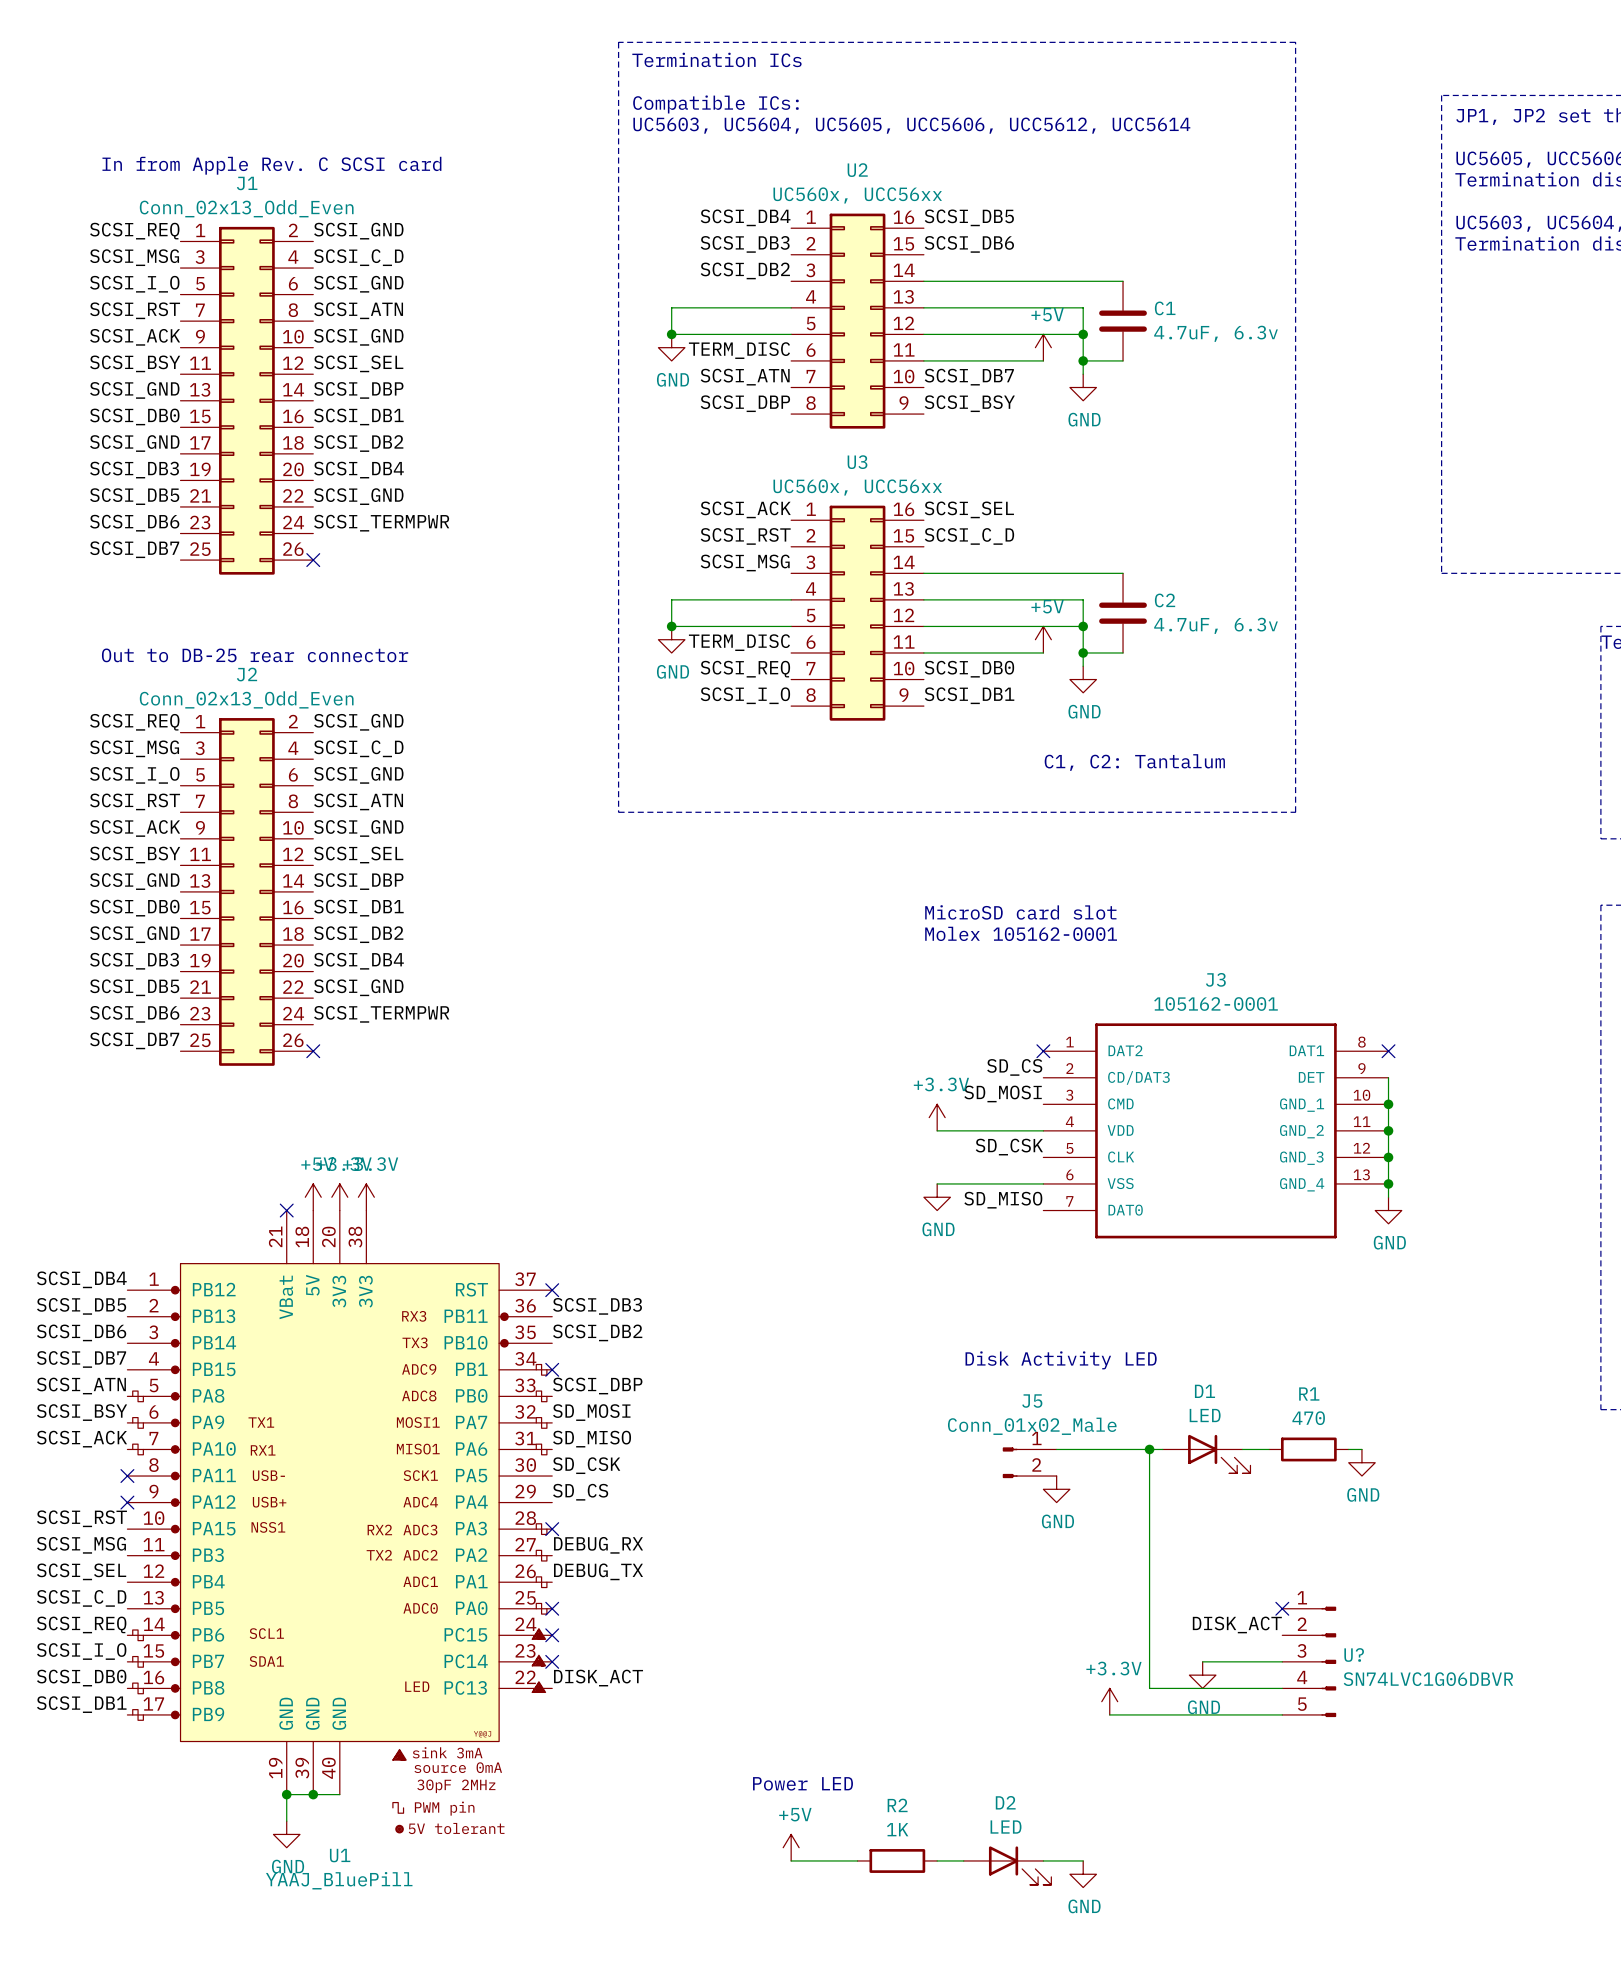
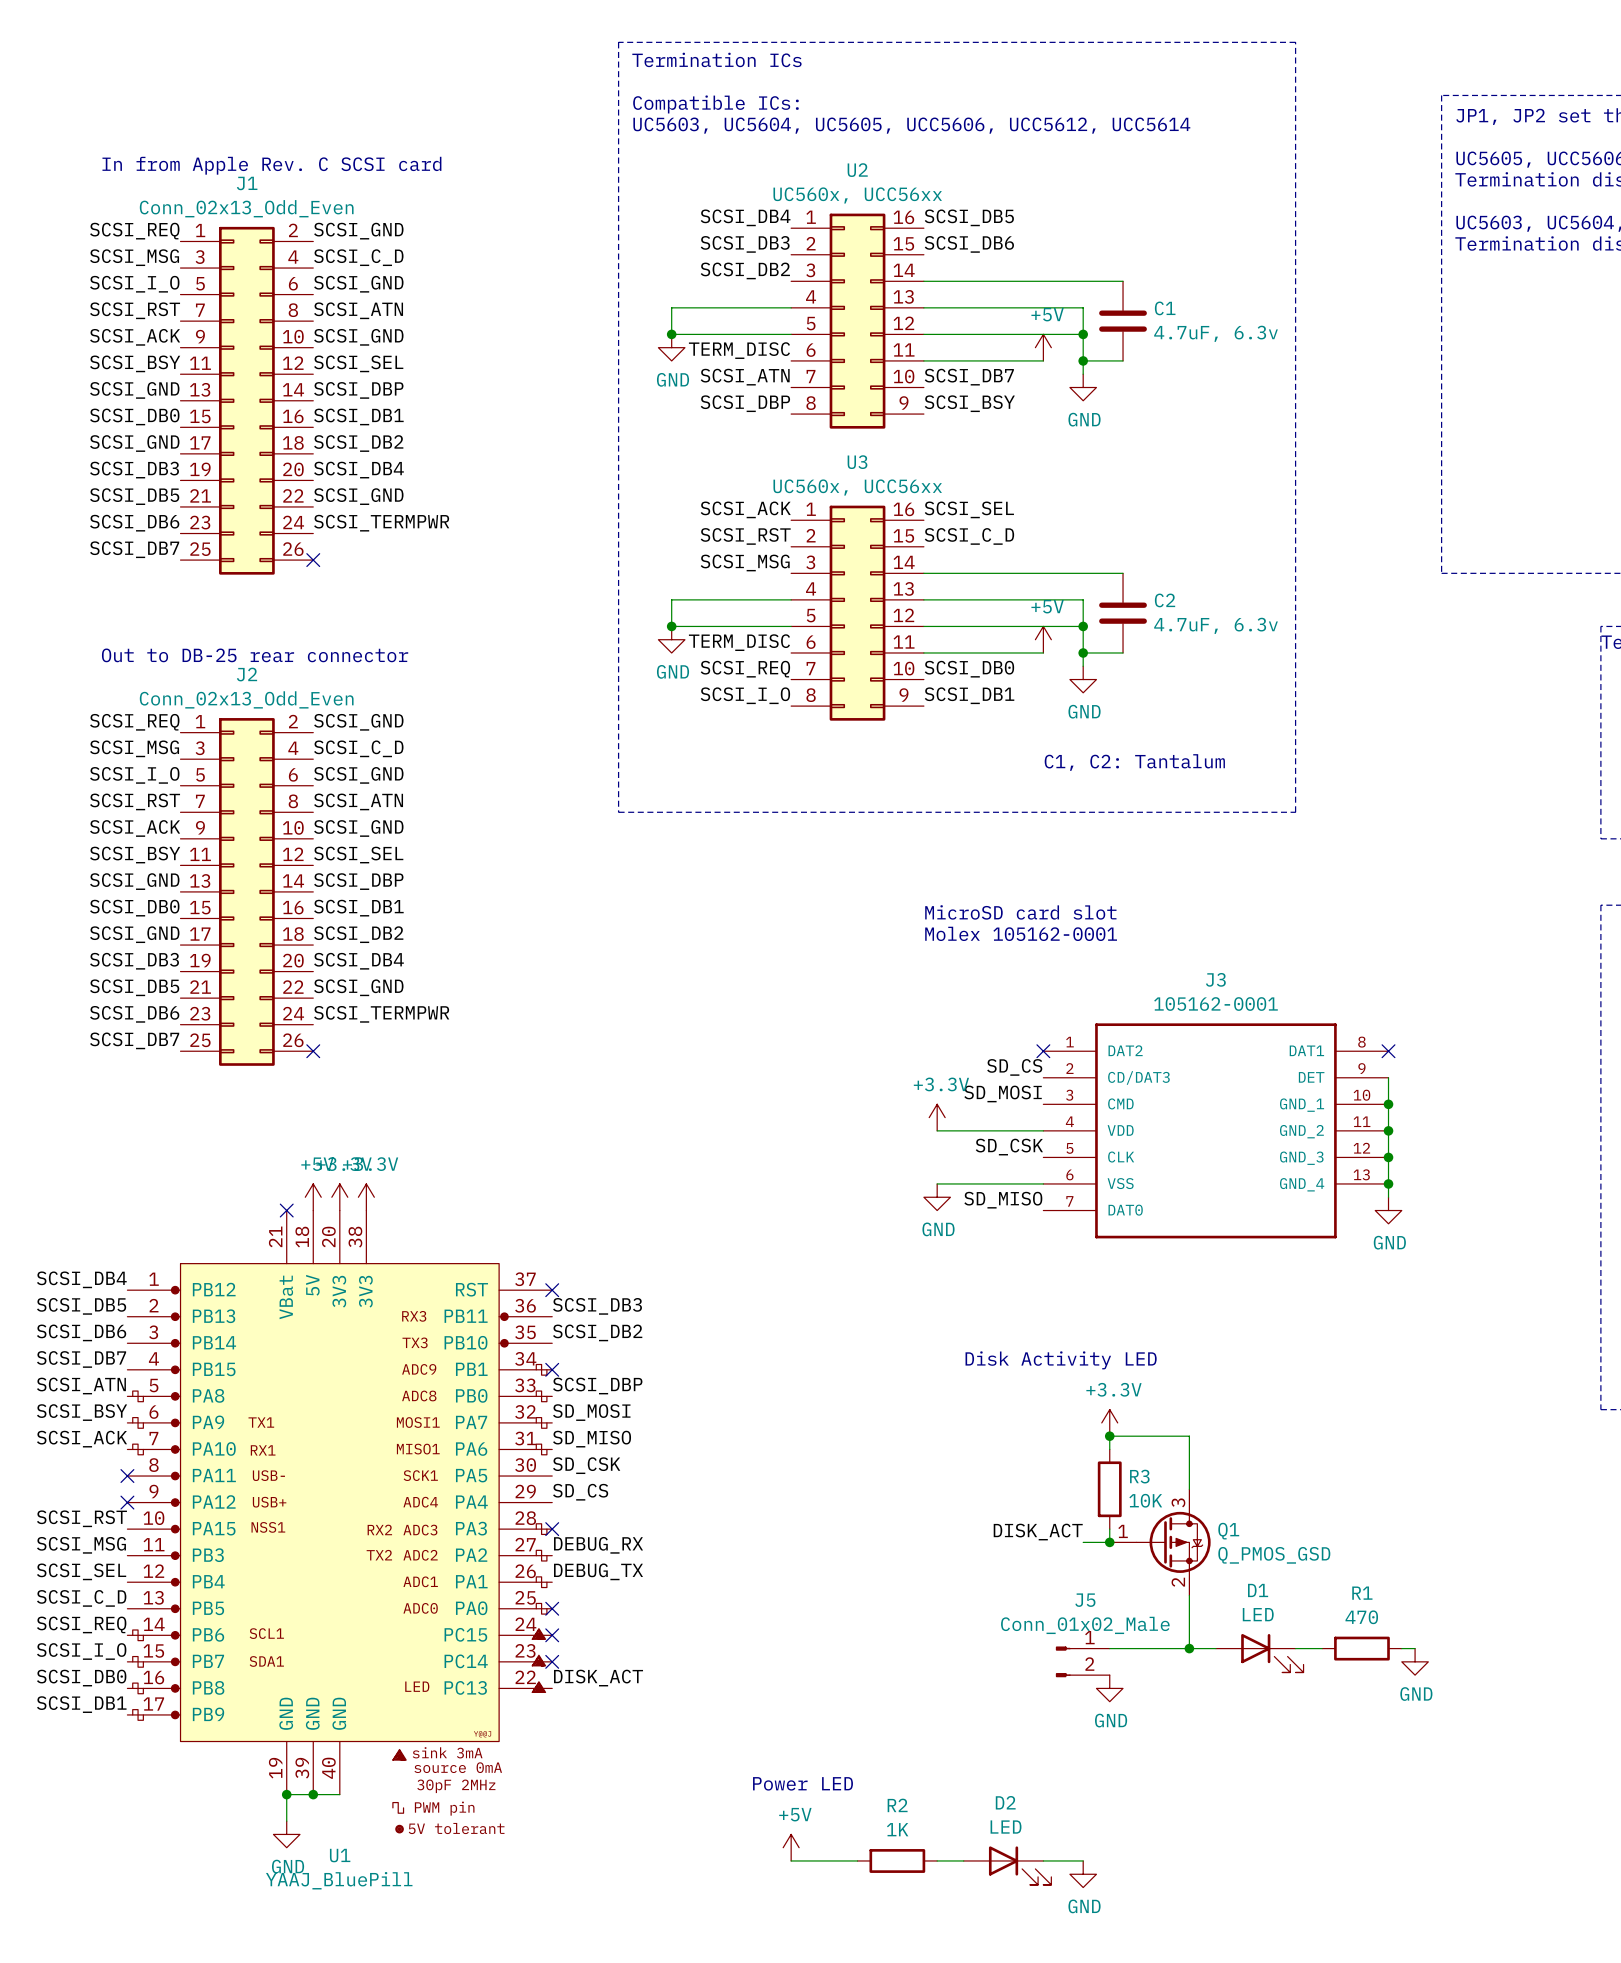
power symbol: none -> +3.3V (1109, 1422)
wire: (1056, 1449) (1162, 1449) -> (1109, 1648) (1215, 1648)
wire: none -> (1109, 1449) (1109, 1436) (1189, 1436) (1189, 1489)
wire: (1149, 1449) (1149, 1688) (1282, 1688) -> none
junction position: (1149, 1449) -> (1109, 1436)
wire: (1242, 1449) (1269, 1449) -> (1295, 1648) (1322, 1648)
R1 position: (1308, 1449) -> (1361, 1648)
wire: (1348, 1449) (1361, 1449) -> (1401, 1648) (1415, 1648)
D1 position: (1206, 1454) -> (1259, 1653)
J5 position: (1029, 1462) -> (1082, 1661)
power symbol: GND (1361, 1462) -> none
power symbol: GND (1056, 1489) -> none
R3: none -> 10K (1109, 1489)
wire: none -> (1109, 1529) (1109, 1542) (1083, 1542)
junction: none -> (1109, 1542)
Q1: none -> Q_PMOS_GSD (1160, 1542)
wire: none -> (1189, 1595) (1189, 1648)
no-connect mark: (1282, 1608) -> none
label position: DISK_ACT (1237, 1624) -> DISK_ACT (1038, 1532)
junction: none -> (1189, 1648)
wire: (1202, 1661) (1282, 1661) -> none
U?: SN74LVC1G06DBVR (1309, 1661) -> none
power symbol: none -> GND (1415, 1661)
power symbol position: GND (1202, 1675) -> GND (1109, 1688)
power symbol: +3.3V (1109, 1701) -> none
wire: (1109, 1714) (1282, 1714) -> none

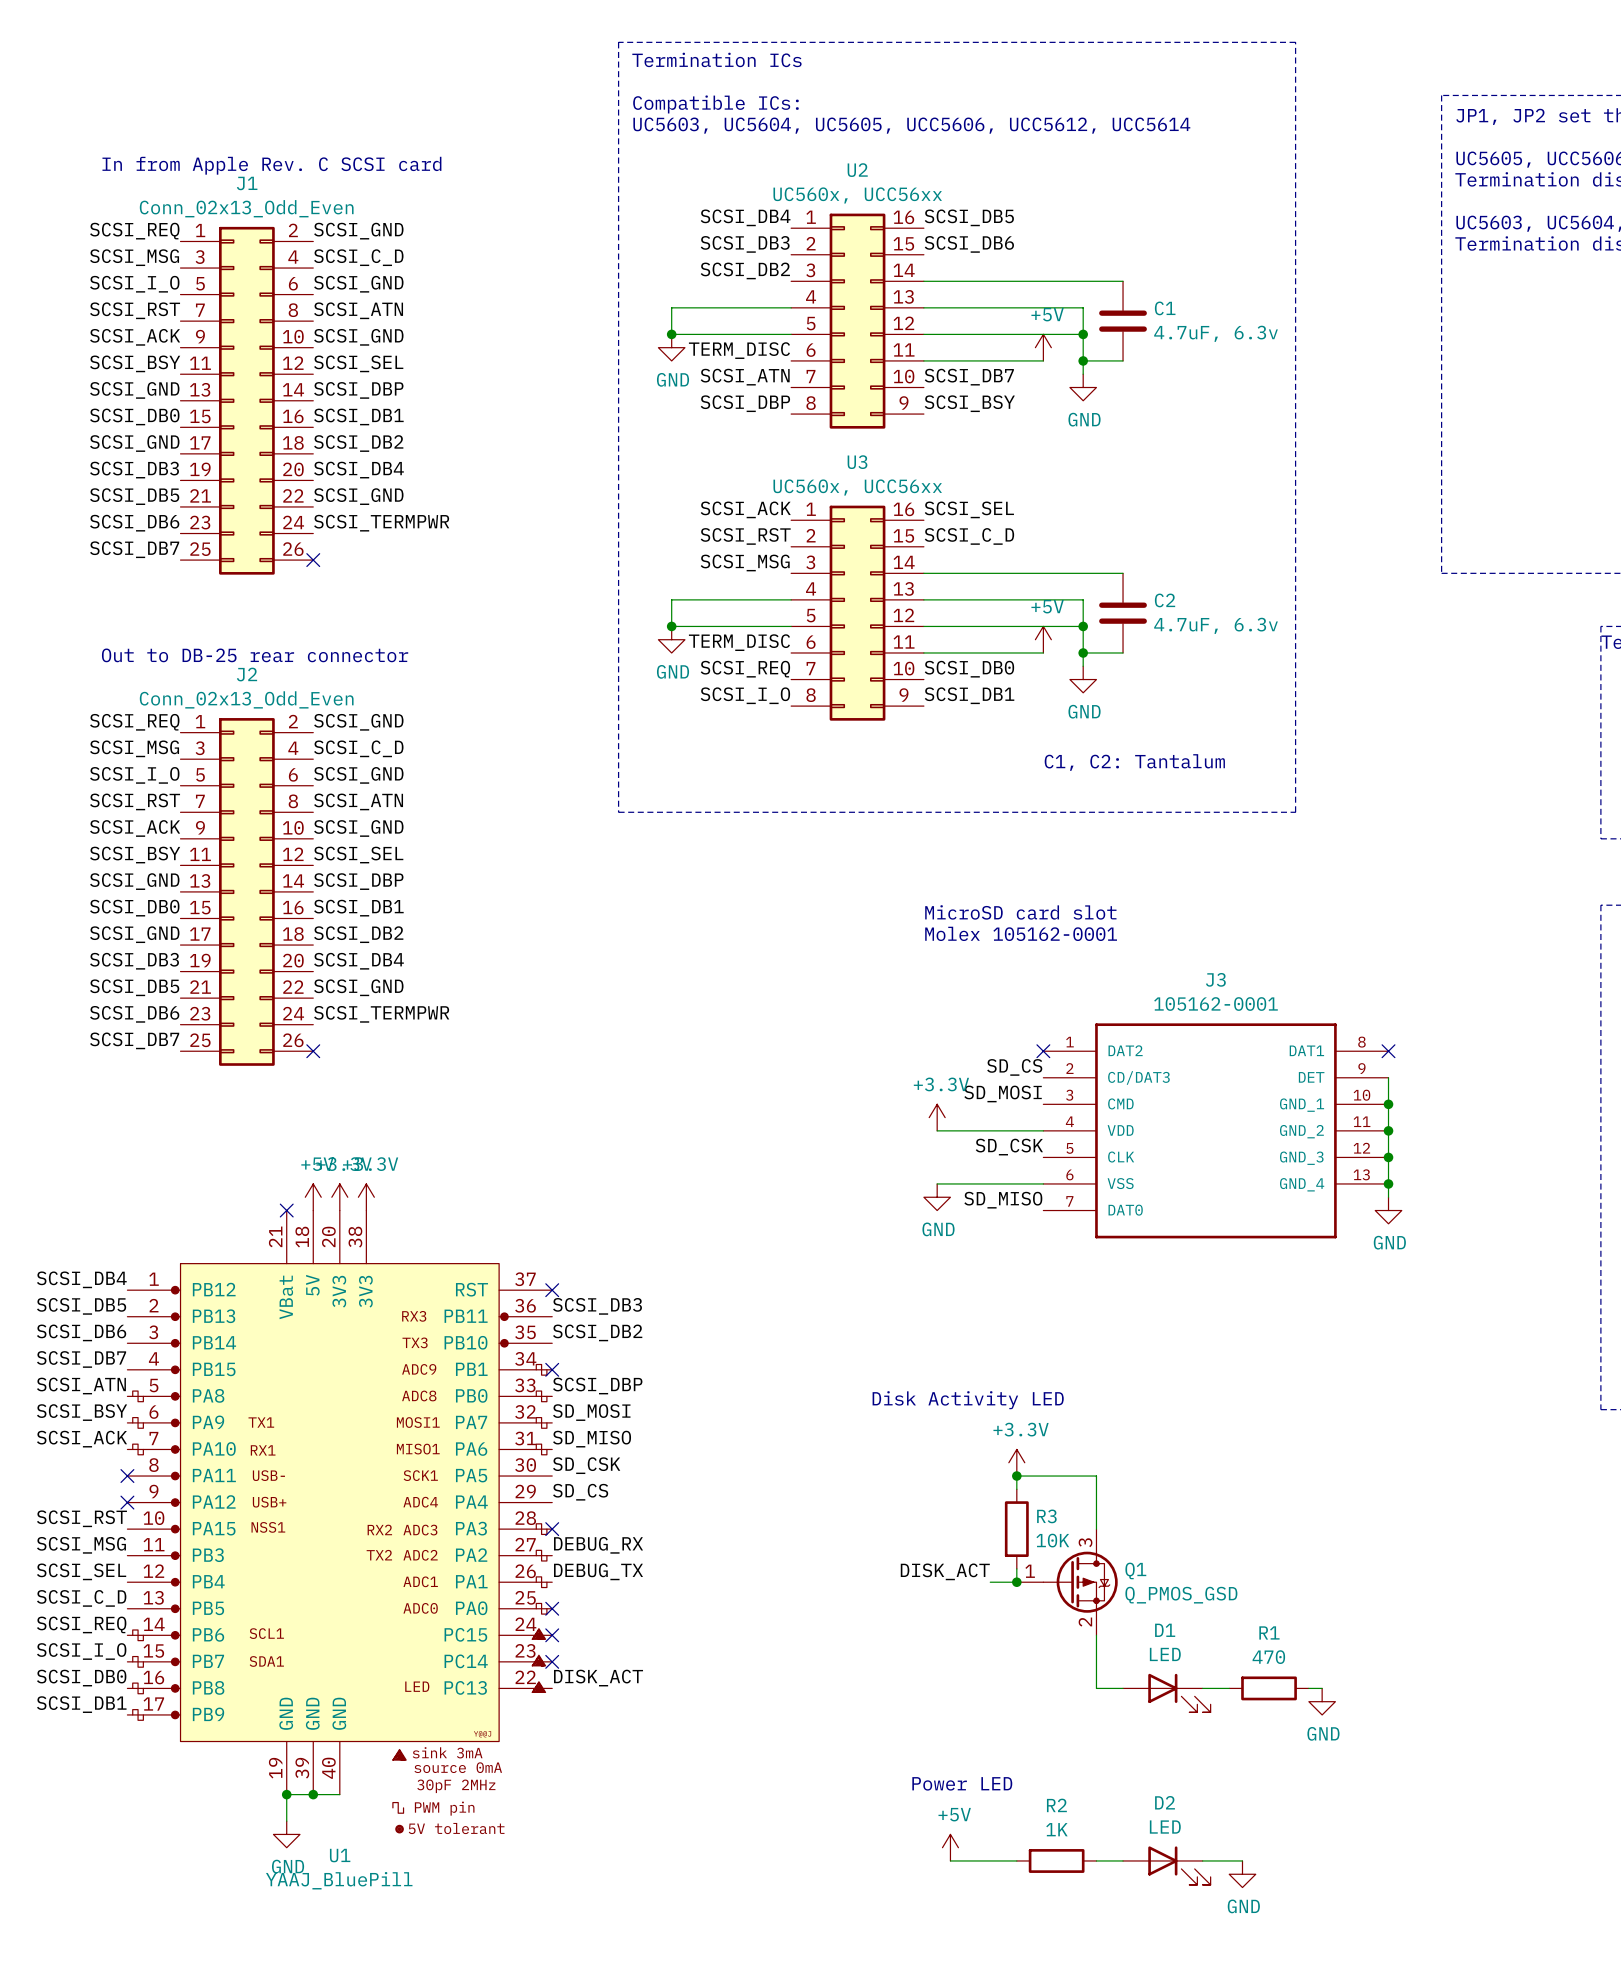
text position: Disk Activity LED (1061, 1360) -> Disk Activity LED (968, 1400)
power symbol position: +3.3V (1109, 1422) -> +3.3V (1016, 1462)
junction: (1109, 1436) -> none
wire: (1109, 1449) (1109, 1436) (1189, 1436) (1189, 1489) -> (1016, 1489) (1016, 1476) (1096, 1476) (1096, 1529)
junction: none -> (1016, 1476)
R3 position: (1109, 1489) -> (1016, 1529)
wire: (1109, 1529) (1109, 1542) (1083, 1542) -> (1016, 1568) (1016, 1582) (990, 1582)
label position: DISK_ACT (1038, 1532) -> DISK_ACT (945, 1571)
junction: (1109, 1542) -> none
Q1 position: (1160, 1542) -> (1067, 1582)
junction: none -> (1016, 1582)
wire: (1189, 1595) (1189, 1648) -> none
wire: none -> (1096, 1635) (1096, 1688) (1123, 1688)
wire: (1109, 1648) (1215, 1648) -> none
junction: (1189, 1648) -> none
wire: (1295, 1648) (1322, 1648) -> (1202, 1688) (1229, 1688)
R1 position: (1361, 1648) -> (1269, 1688)
wire: (1401, 1648) (1415, 1648) -> (1308, 1688) (1322, 1688)
D1 position: (1259, 1653) -> (1166, 1693)
J5: Conn_01x02_Male (1082, 1661) -> none
power symbol position: GND (1415, 1661) -> GND (1322, 1701)
power symbol: GND (1109, 1688) -> none
text position: Power LED (803, 1783) -> Power LED (962, 1783)
power symbol position: +5V (791, 1847) -> +5V (950, 1847)
wire: (791, 1860) (857, 1860) -> none
R2 position: (897, 1860) -> (1056, 1860)
wire: (937, 1860) (950, 1860) -> none
wire: (1043, 1860) (1083, 1860) -> (1202, 1860) (1242, 1860)
wire: none -> (1096, 1860) (1123, 1860)
D2 position: (1007, 1865) -> (1166, 1865)
power symbol: GND (1083, 1874) -> none
power symbol: none -> GND (1242, 1874)

